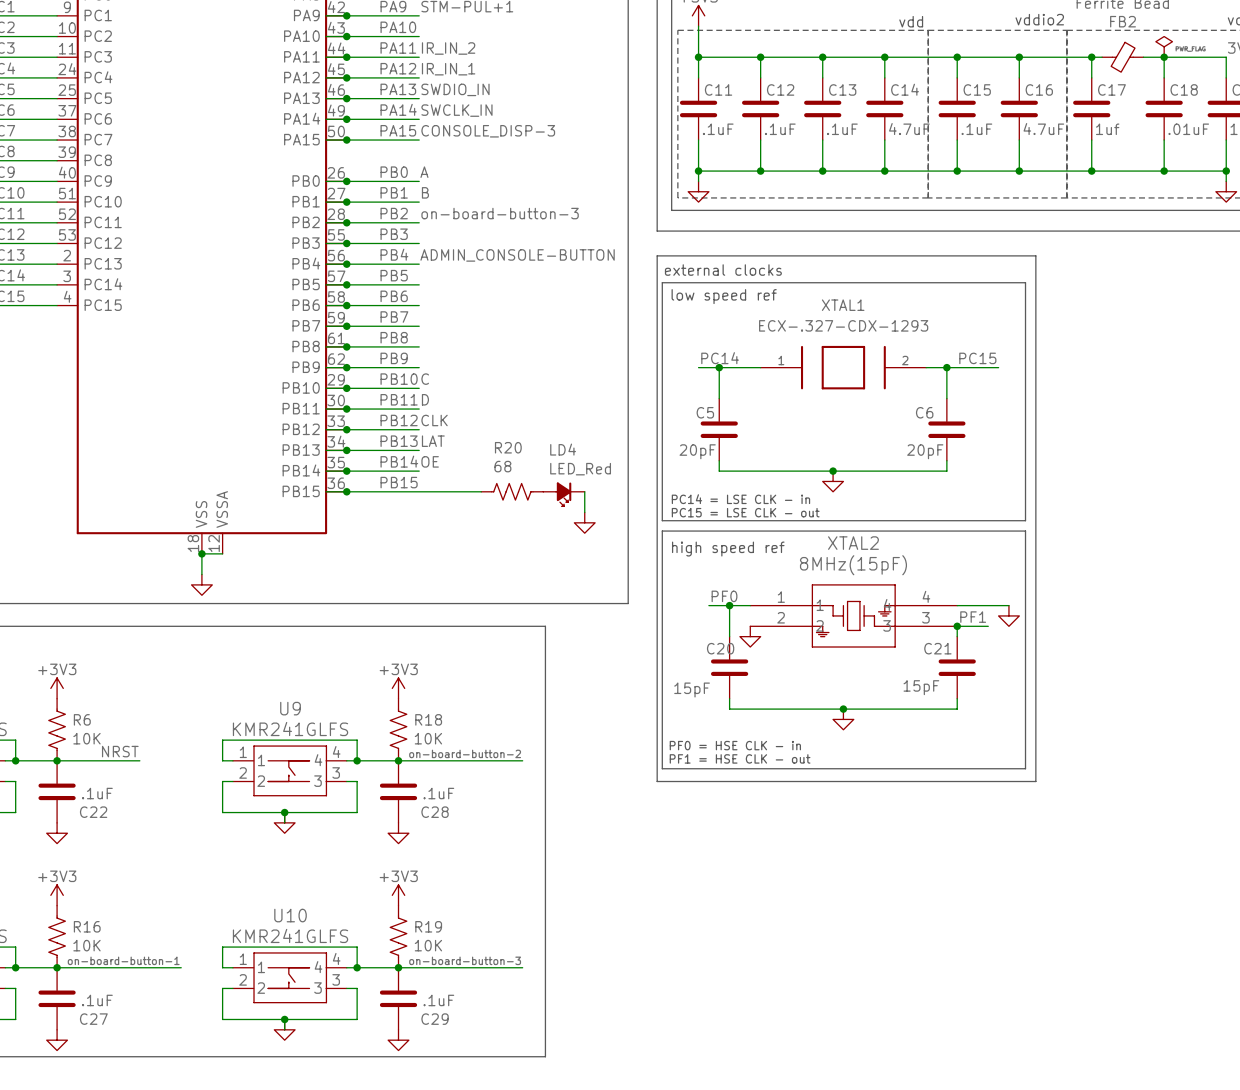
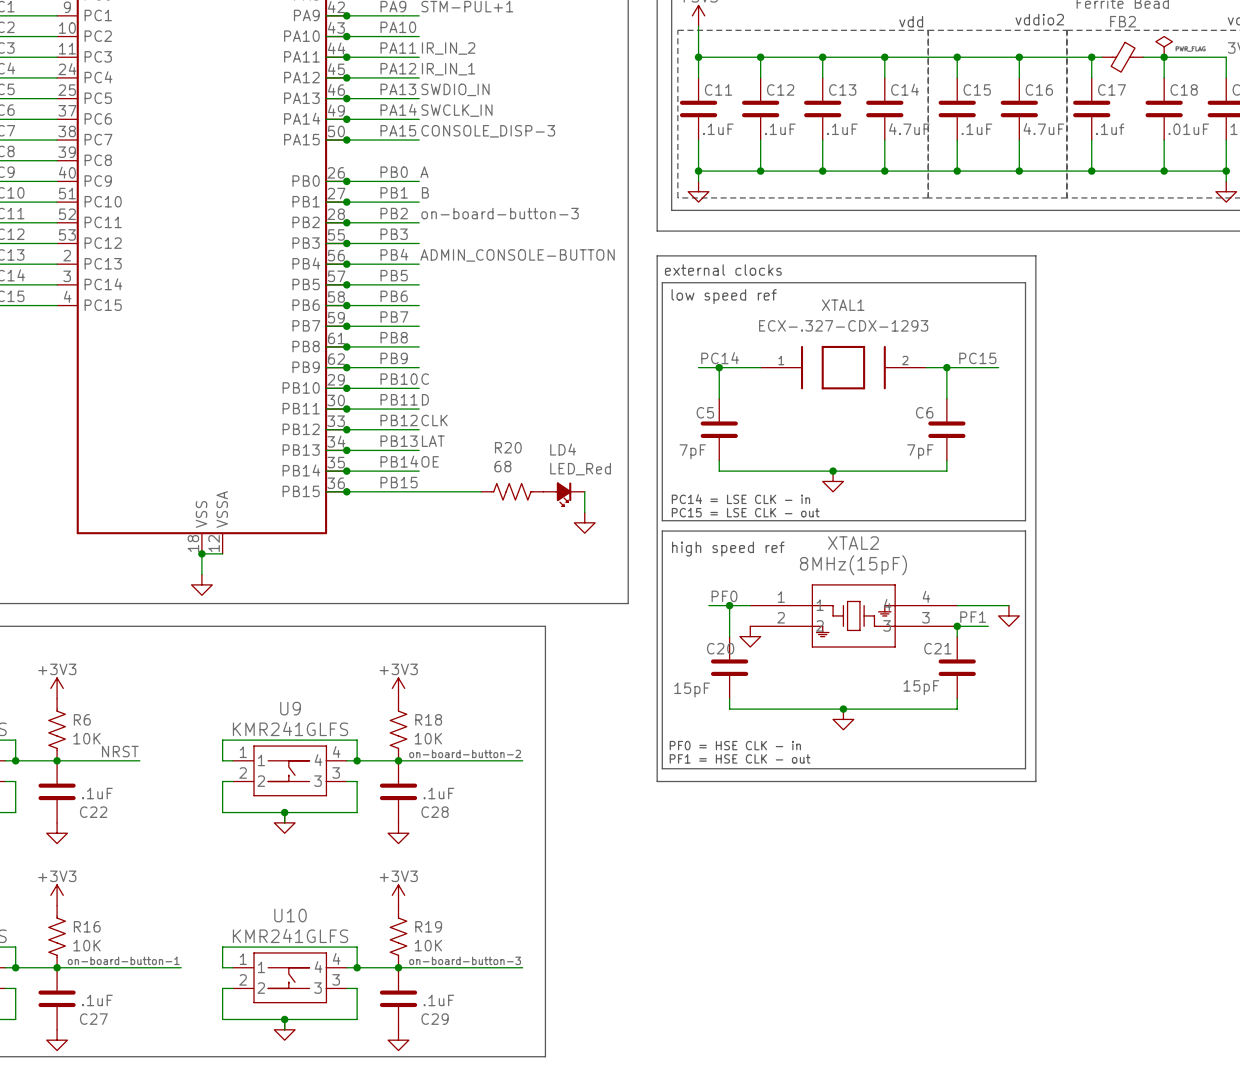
C17 value: 1uf (1107, 129) -> .1uf (1110, 129)
C5 value: 20pF (697, 451) -> 7pF (692, 451)
C6 value: 20pF (925, 451) -> 7pF (920, 451)

